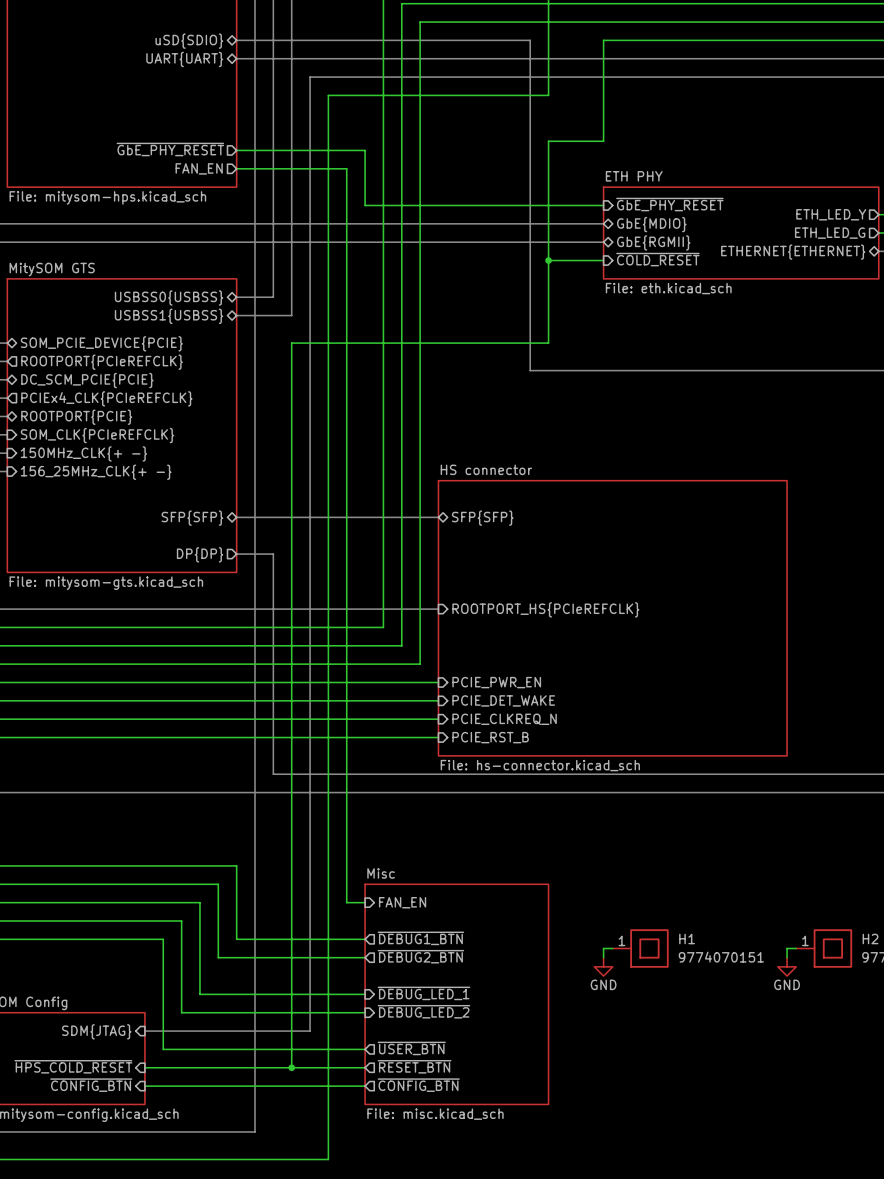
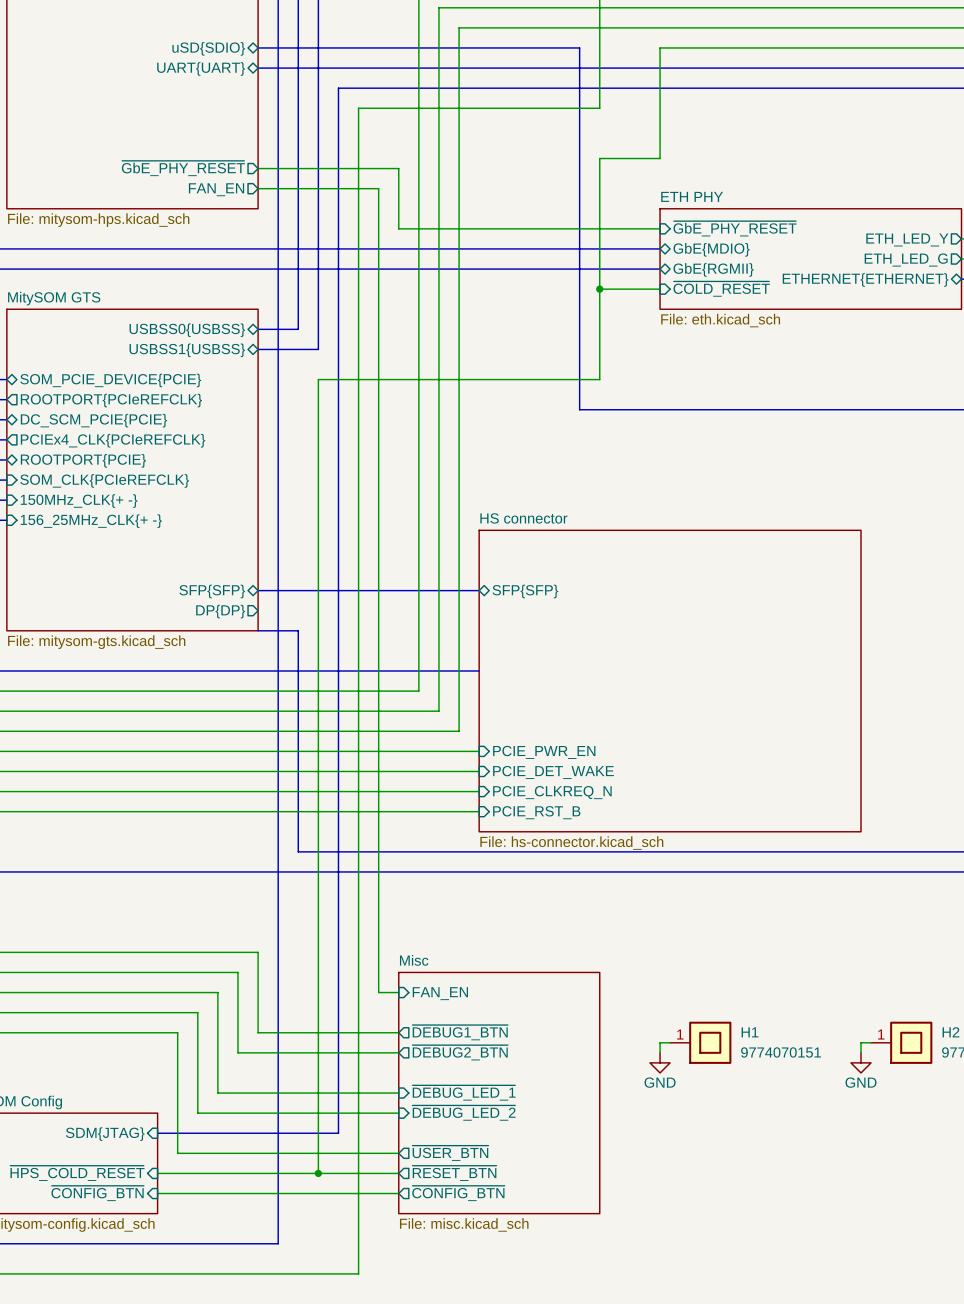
bus: (236, 517) (438, 517) -> (258, 590) (479, 590)
sheet pin position: SFP{SFP} (192, 518) -> SFP{SFP} (212, 591)
sheet pin position: SFP{SFP} (482, 518) -> SFP{SFP} (525, 591)
bus: (236, 554) (273, 554) (273, 572) -> (258, 630) (298, 630)
sheet pin: ROOTPORT_HS{PCIeREFCLK} (545, 609) -> none

